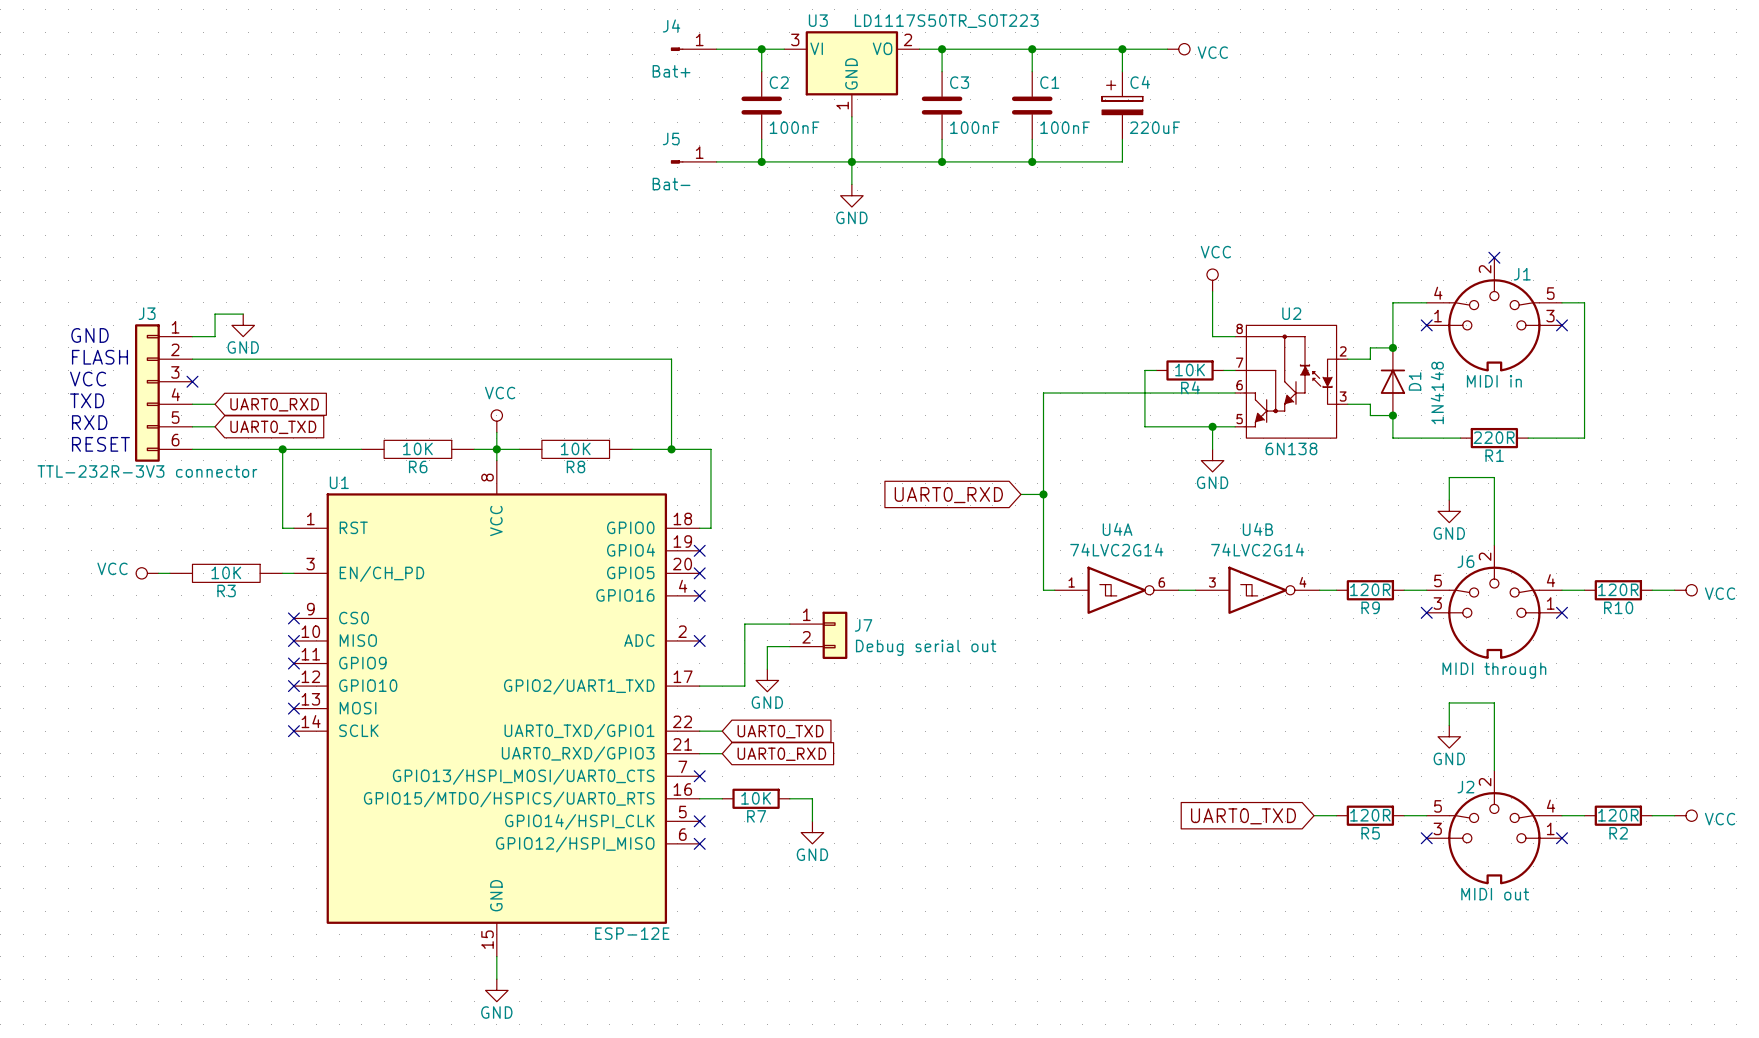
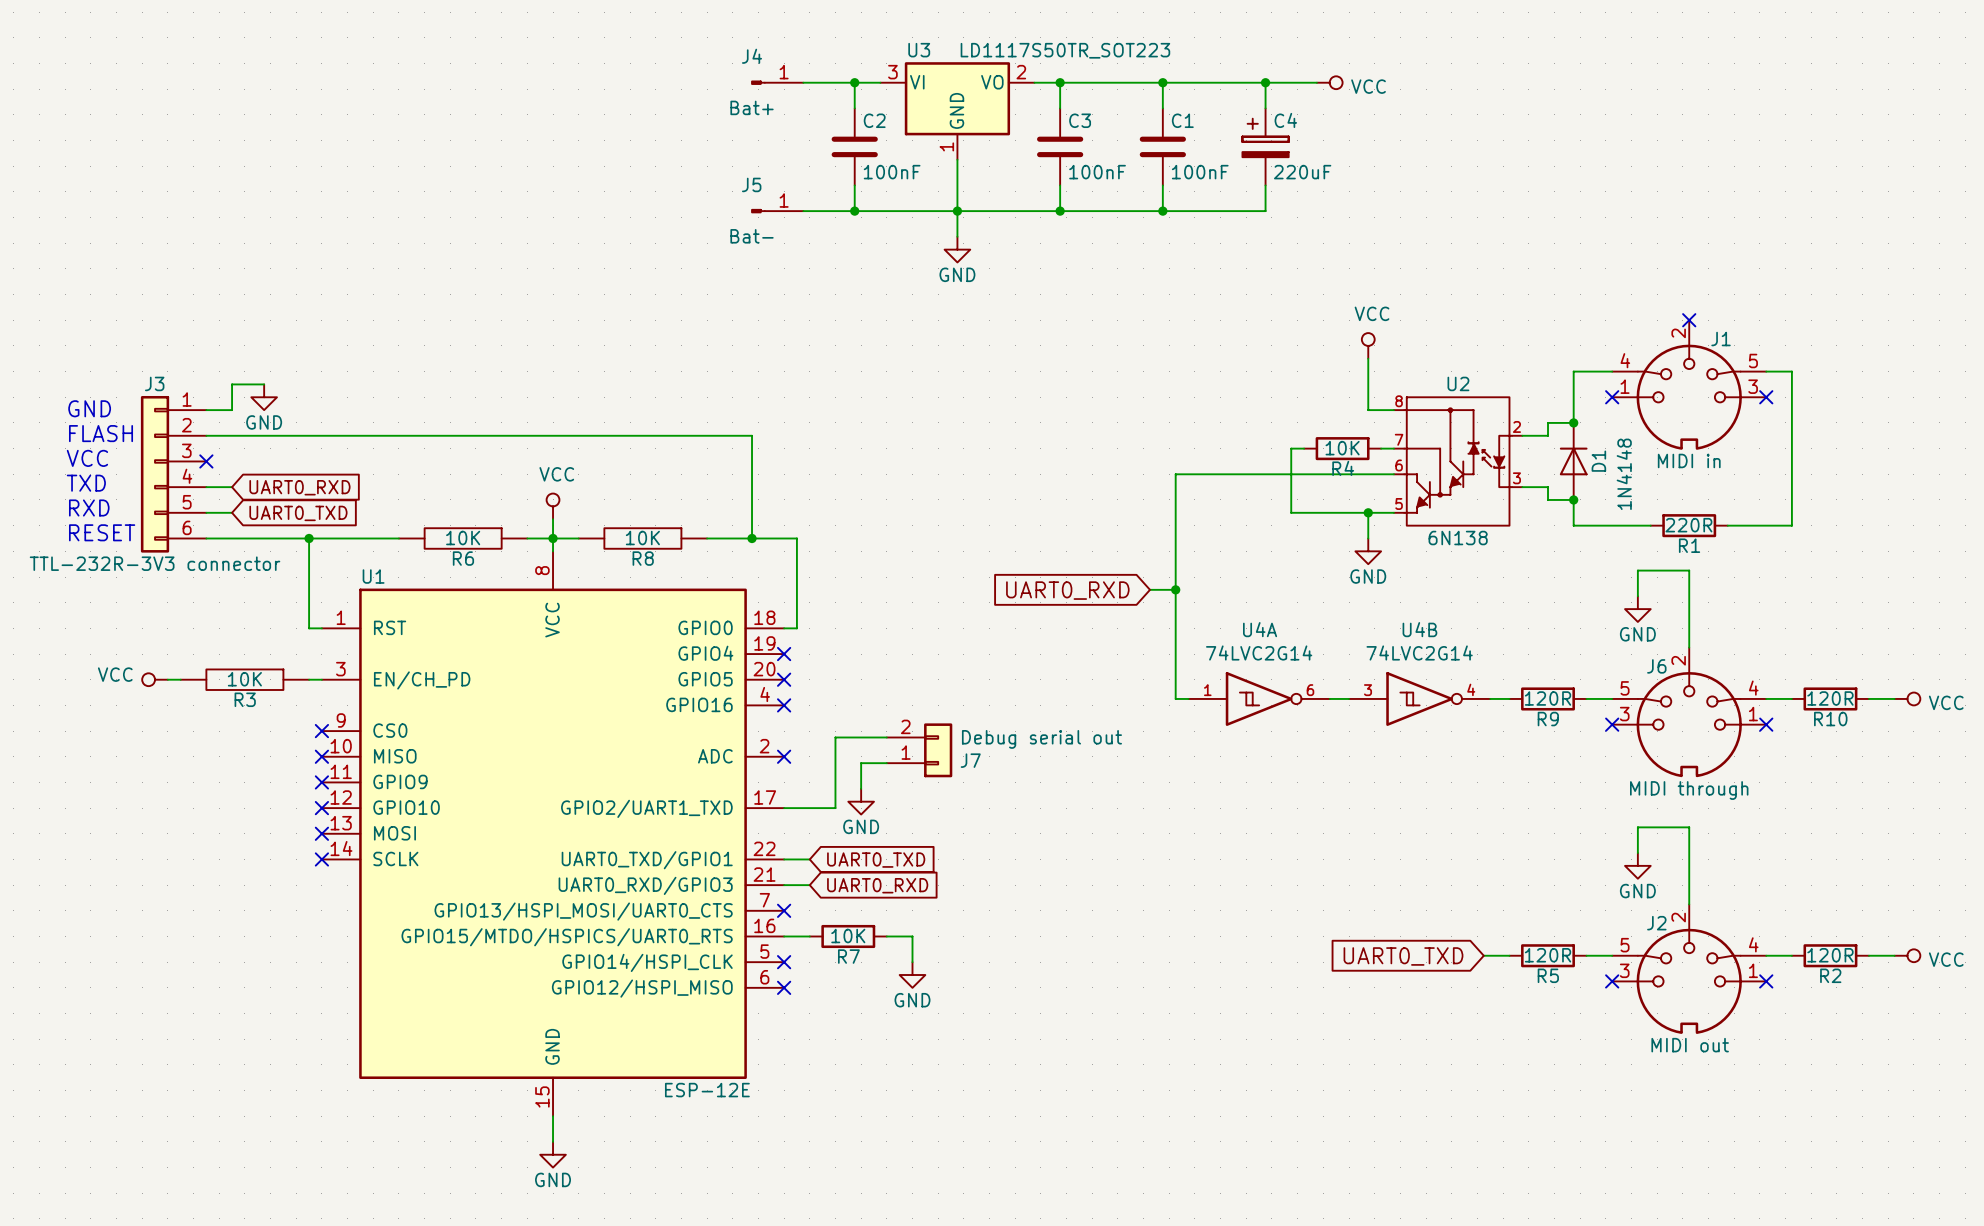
J7 flip: as is (834, 635) -> up-down (938, 750)

